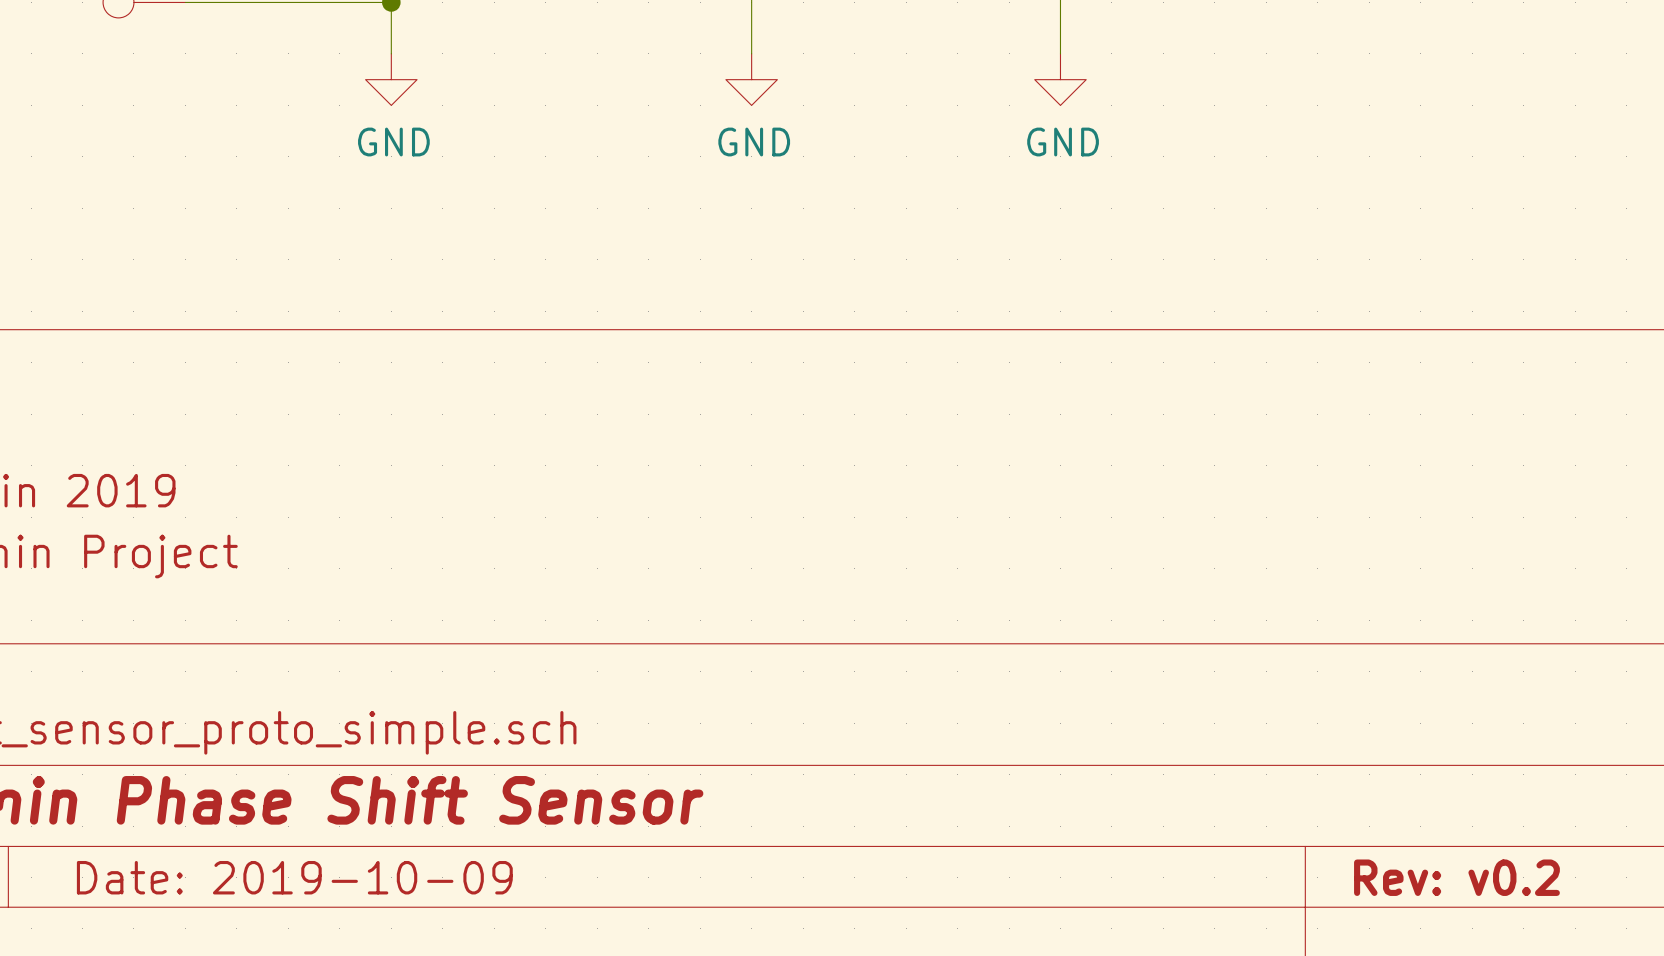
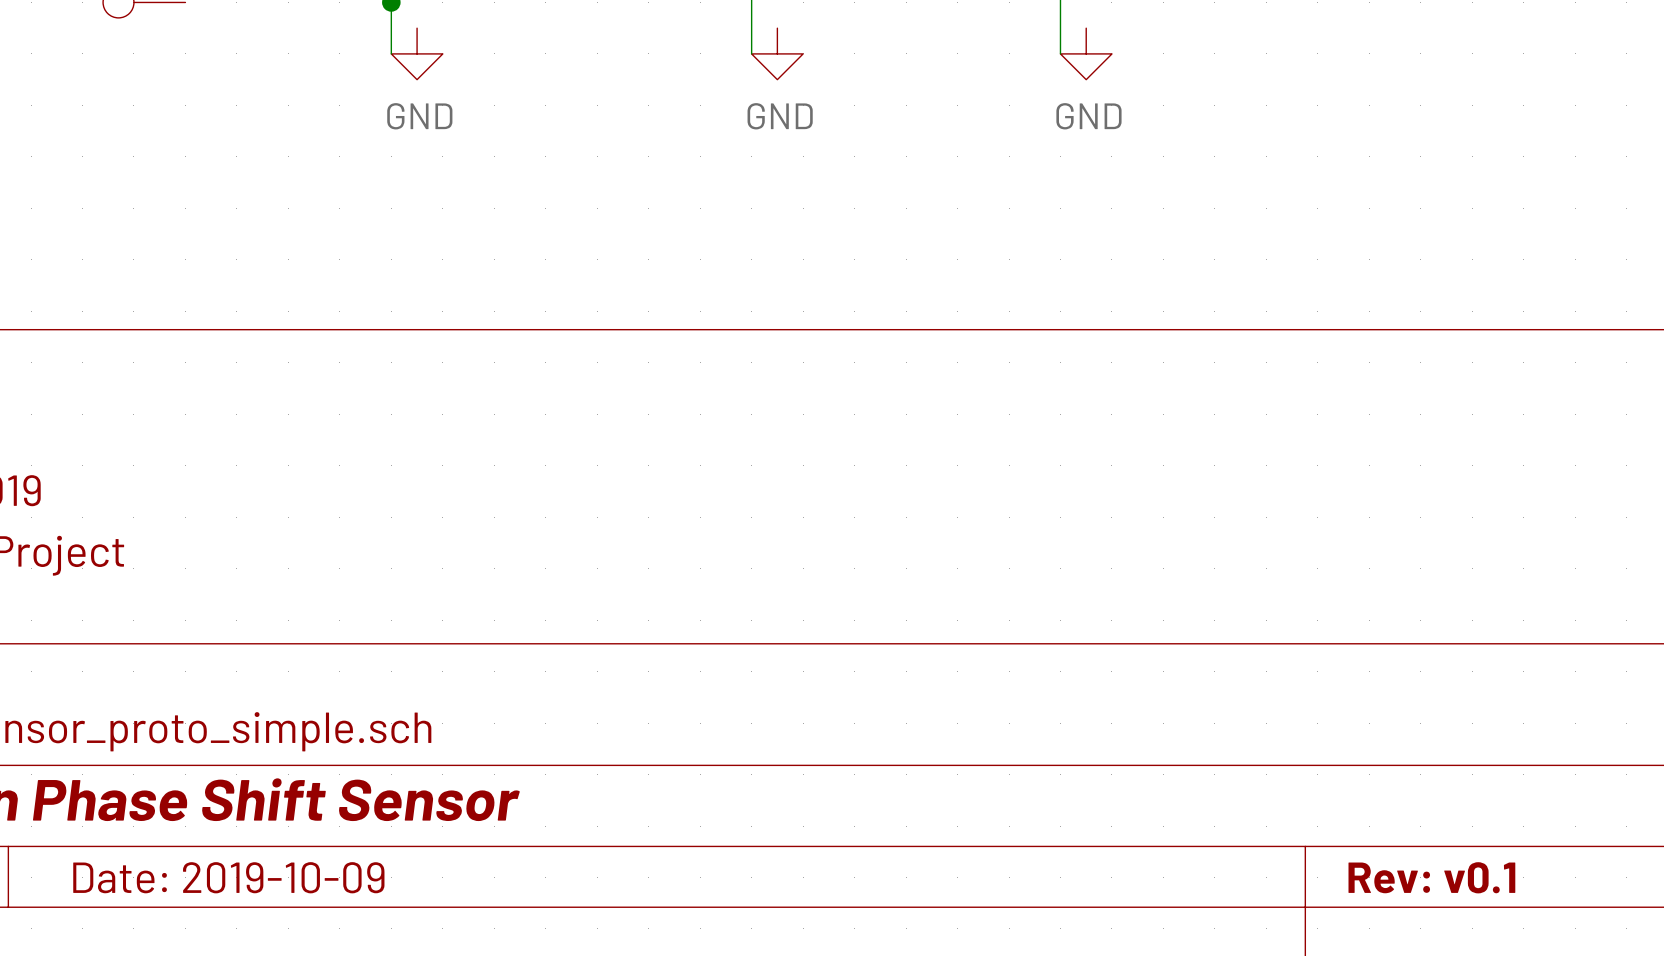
wire: (185, 2) (391, 2) -> none
power symbol position: GND (391, 79) -> GND (417, 53)
power symbol position: GND (751, 79) -> GND (777, 53)
power symbol position: GND (1060, 79) -> GND (1086, 53)
title block: Rev: v0.2 (1456, 877) -> Rev: v0.1 (1431, 877)

